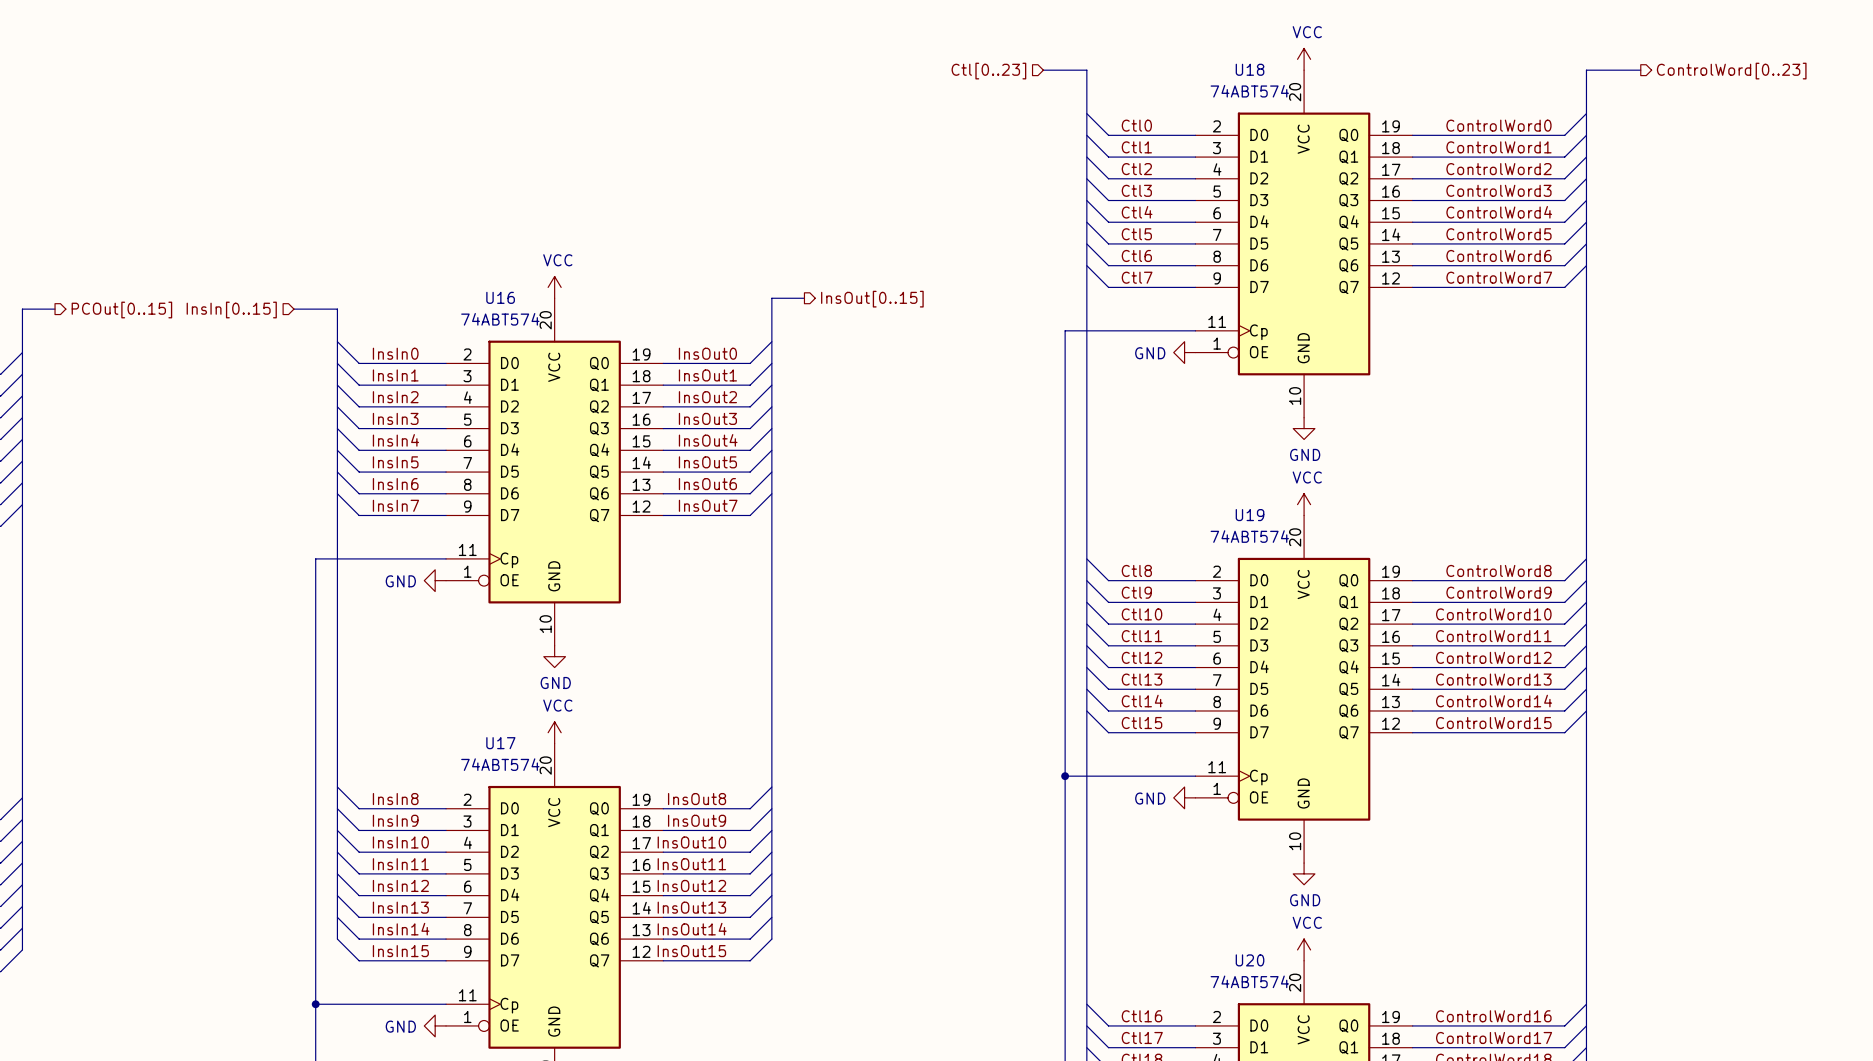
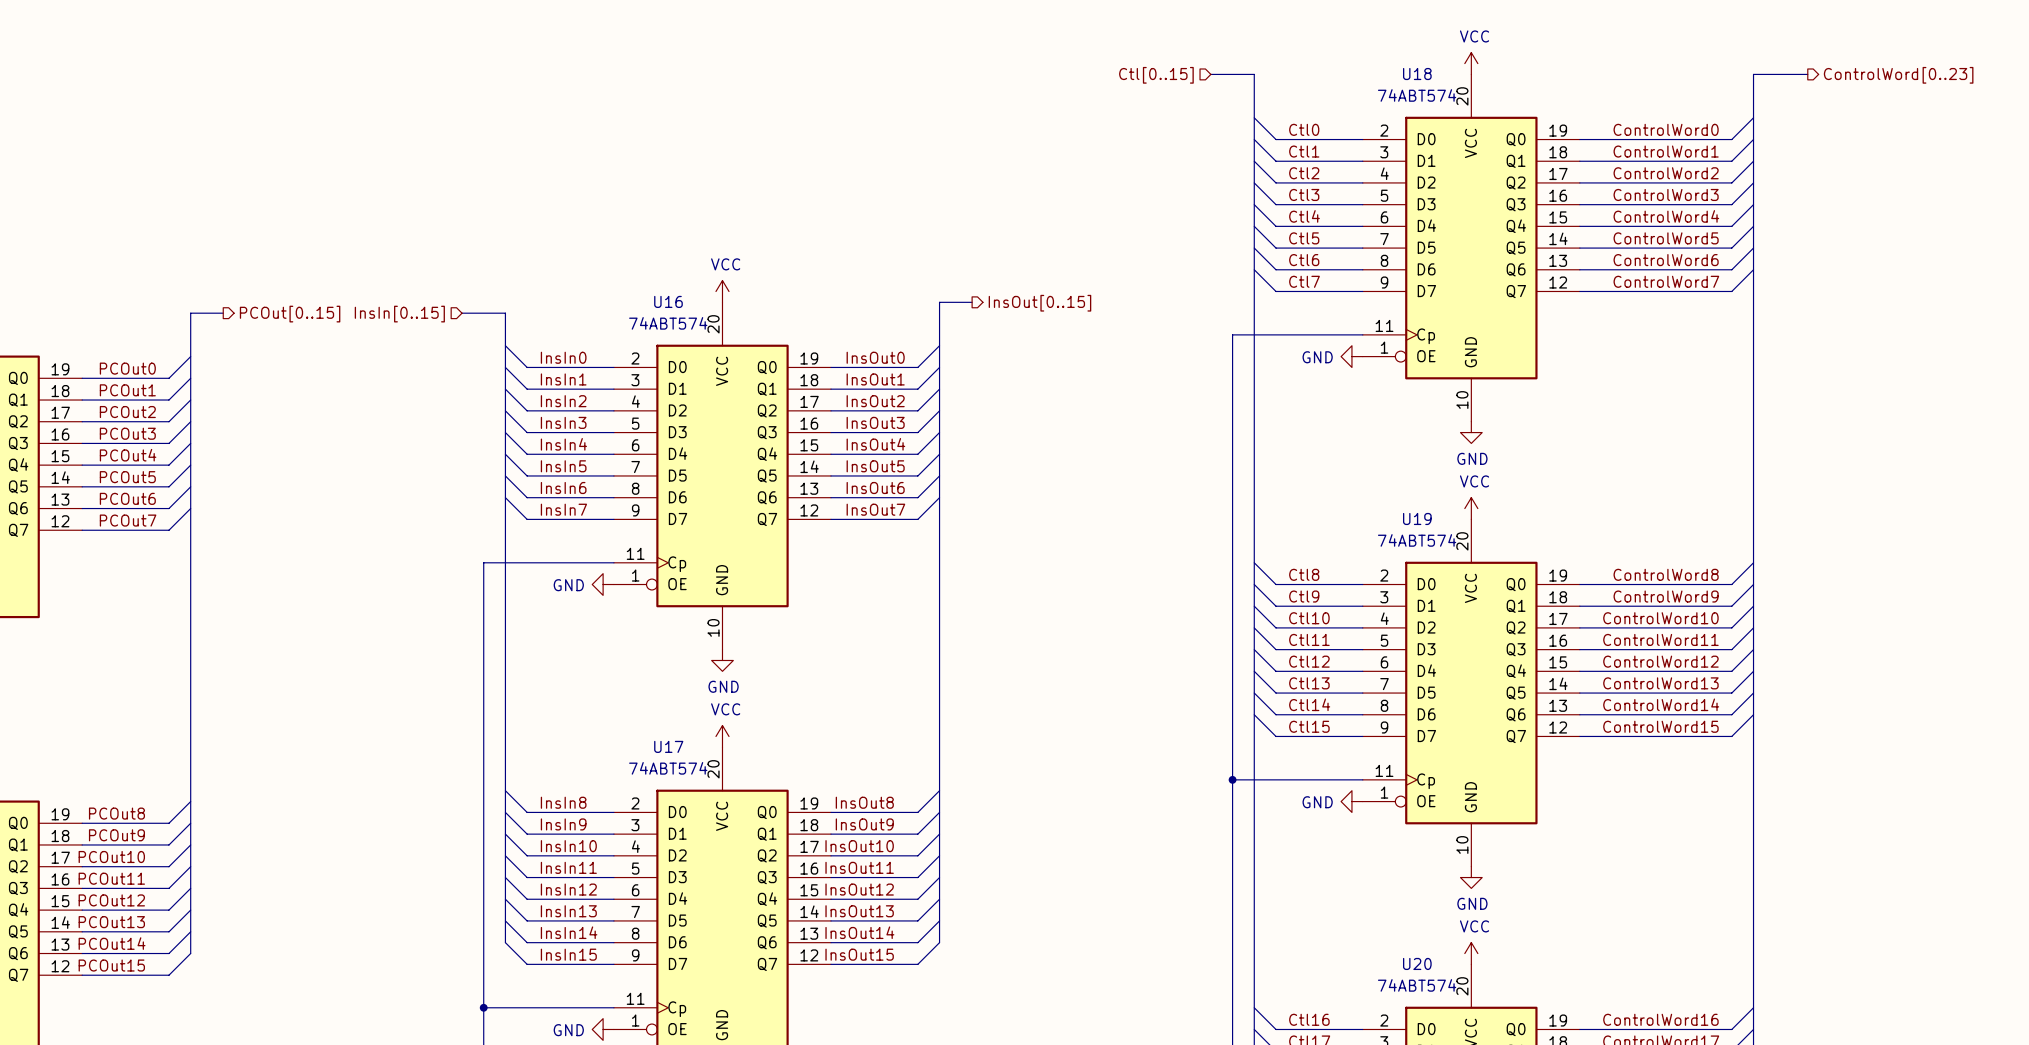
hierarchical label: Ctl[0..23] (988, 71) -> Ctl[0..15] (1156, 75)

